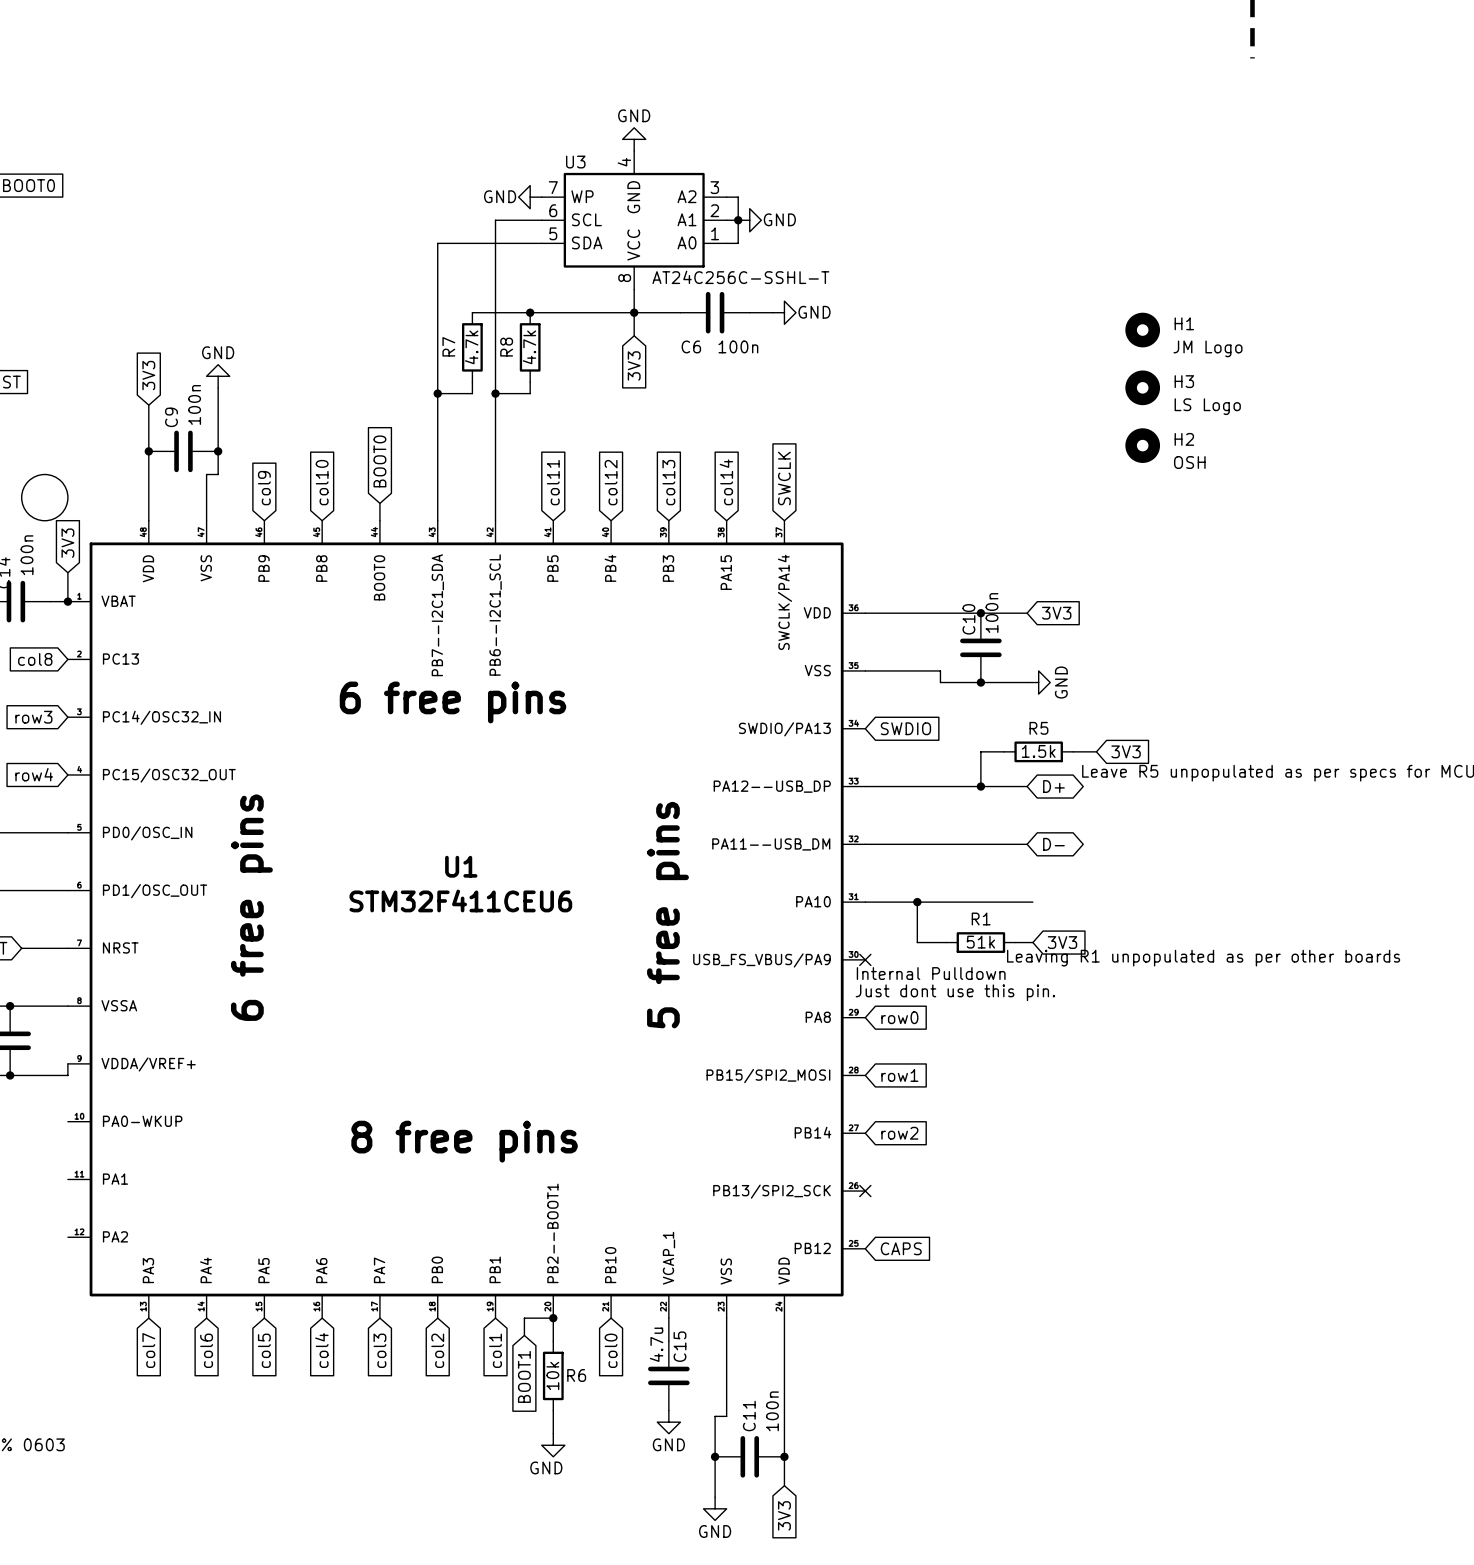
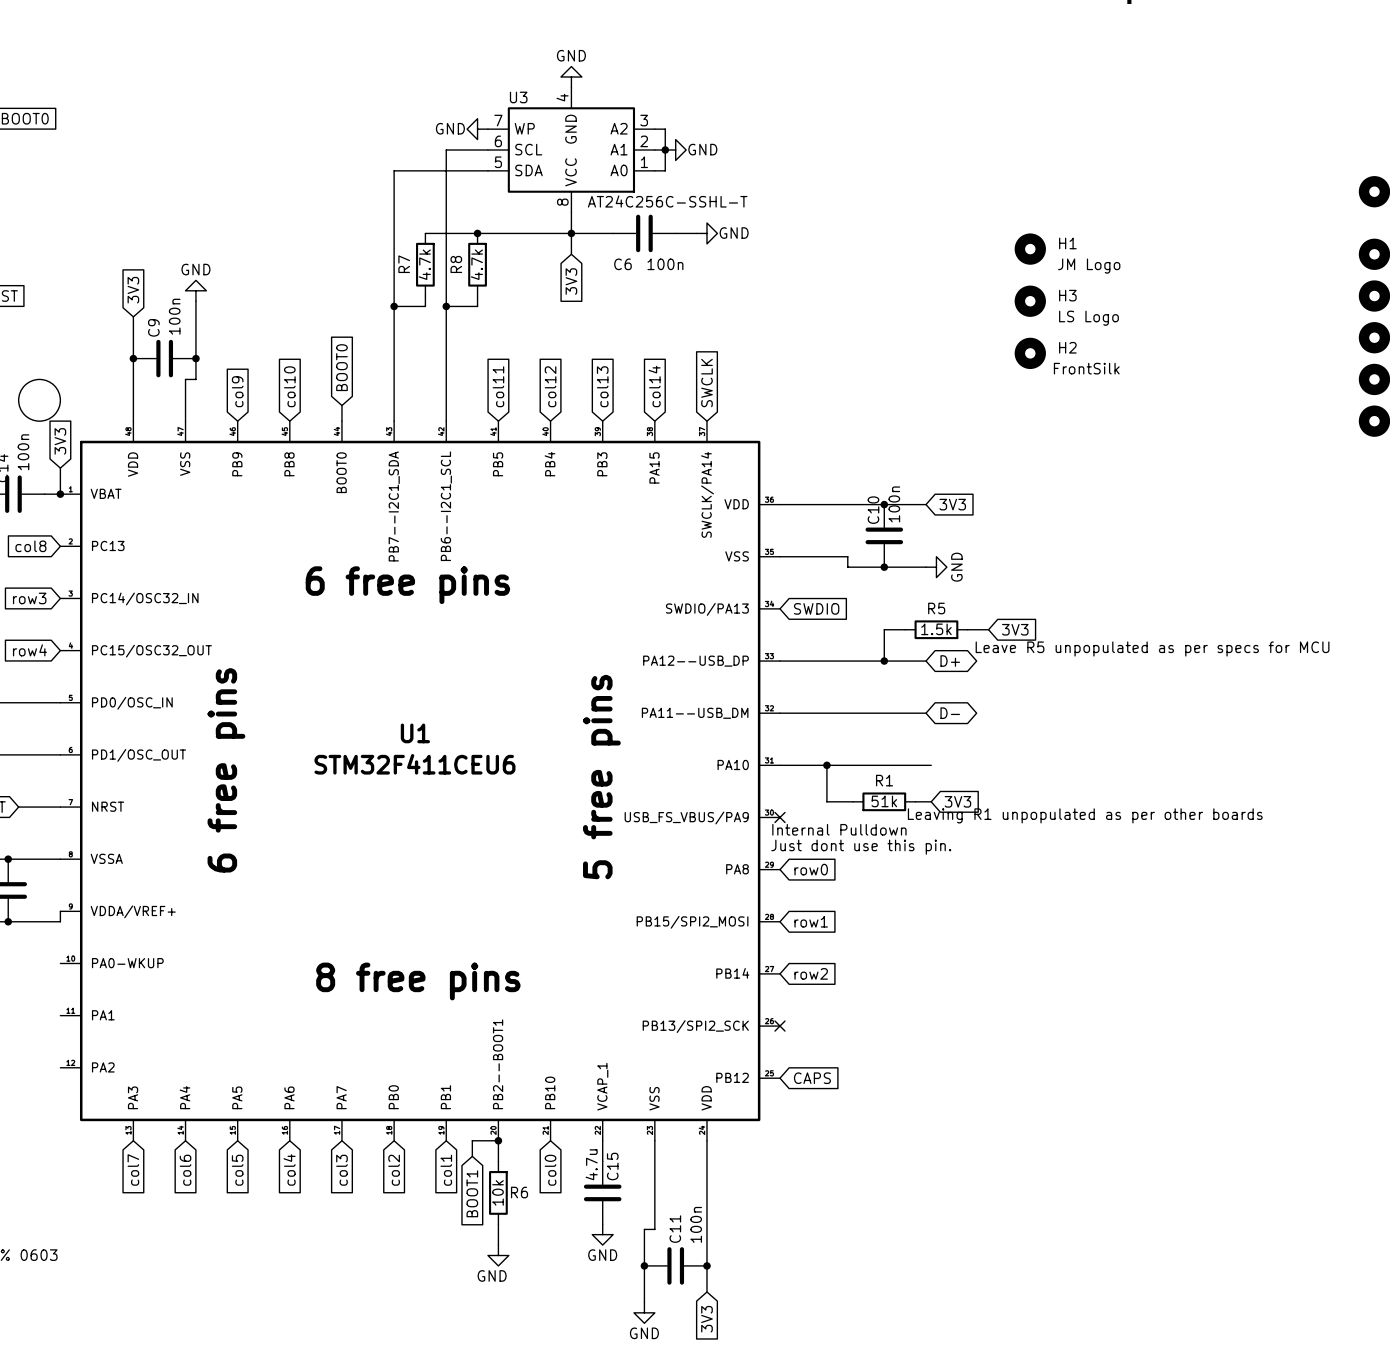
H2 value: OSH (1189, 462) -> FrontSilk (1086, 368)

